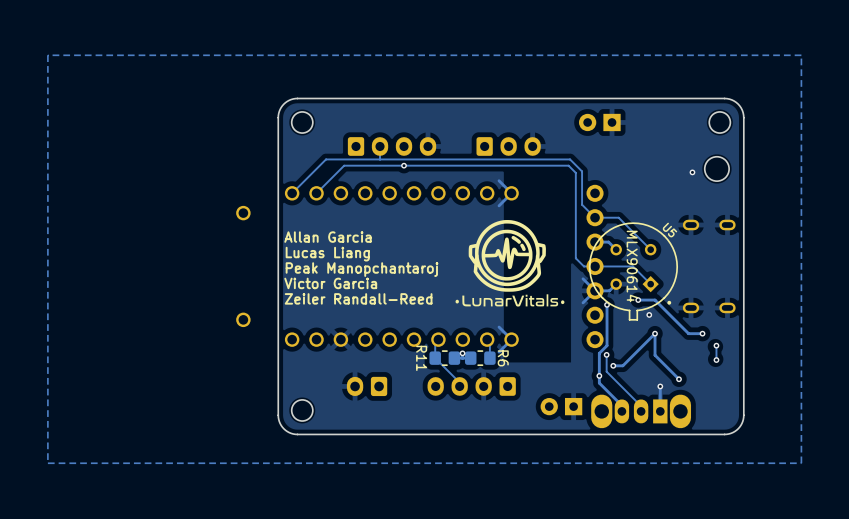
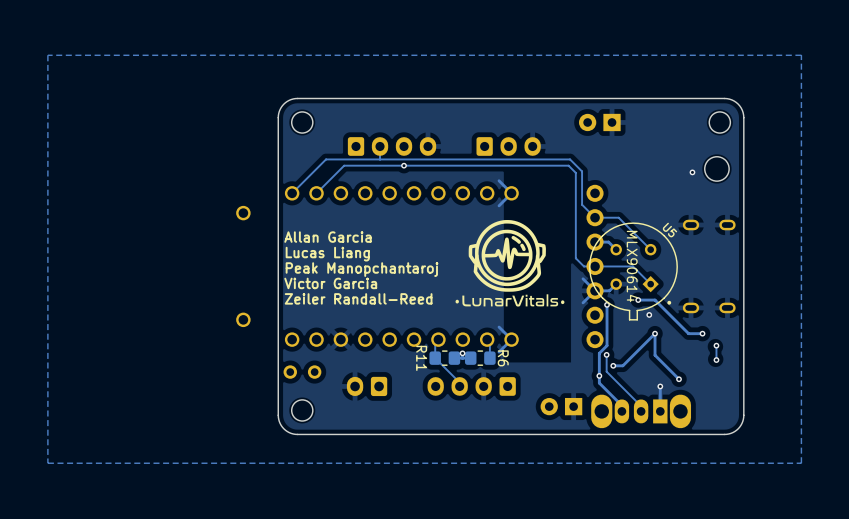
part: none -> (302, 372)

